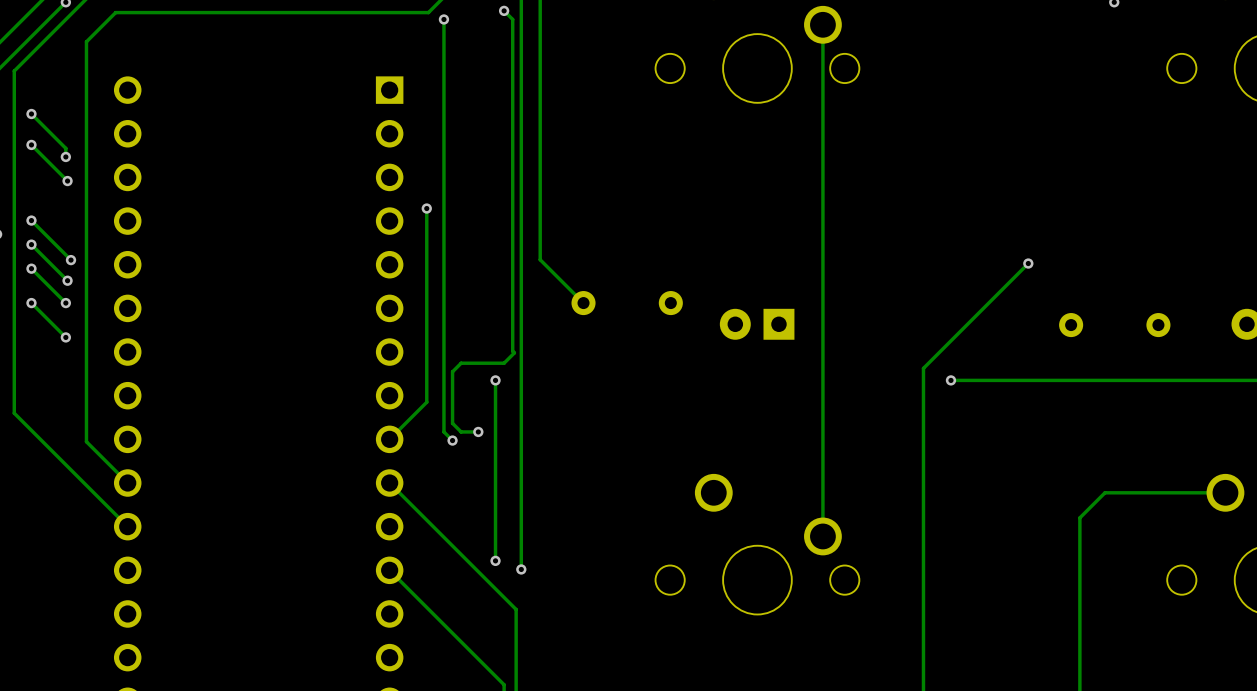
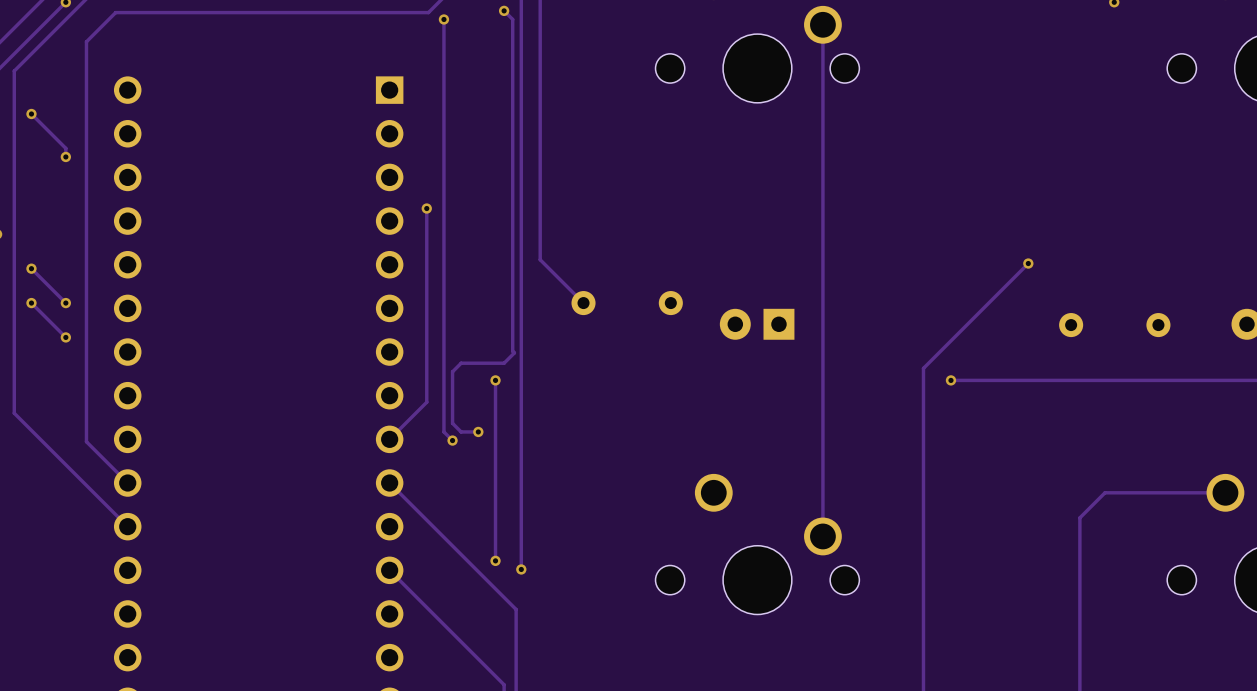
track: (31, 144) (67, 181) -> none
via: (31, 144) -> none
via: (67, 181) -> none
track: (31, 220) (71, 260) -> none
via: (31, 220) -> none
track: (31, 244) (67, 280) -> none
via: (31, 244) -> none
via: (71, 260) -> none
via: (67, 280) -> none

